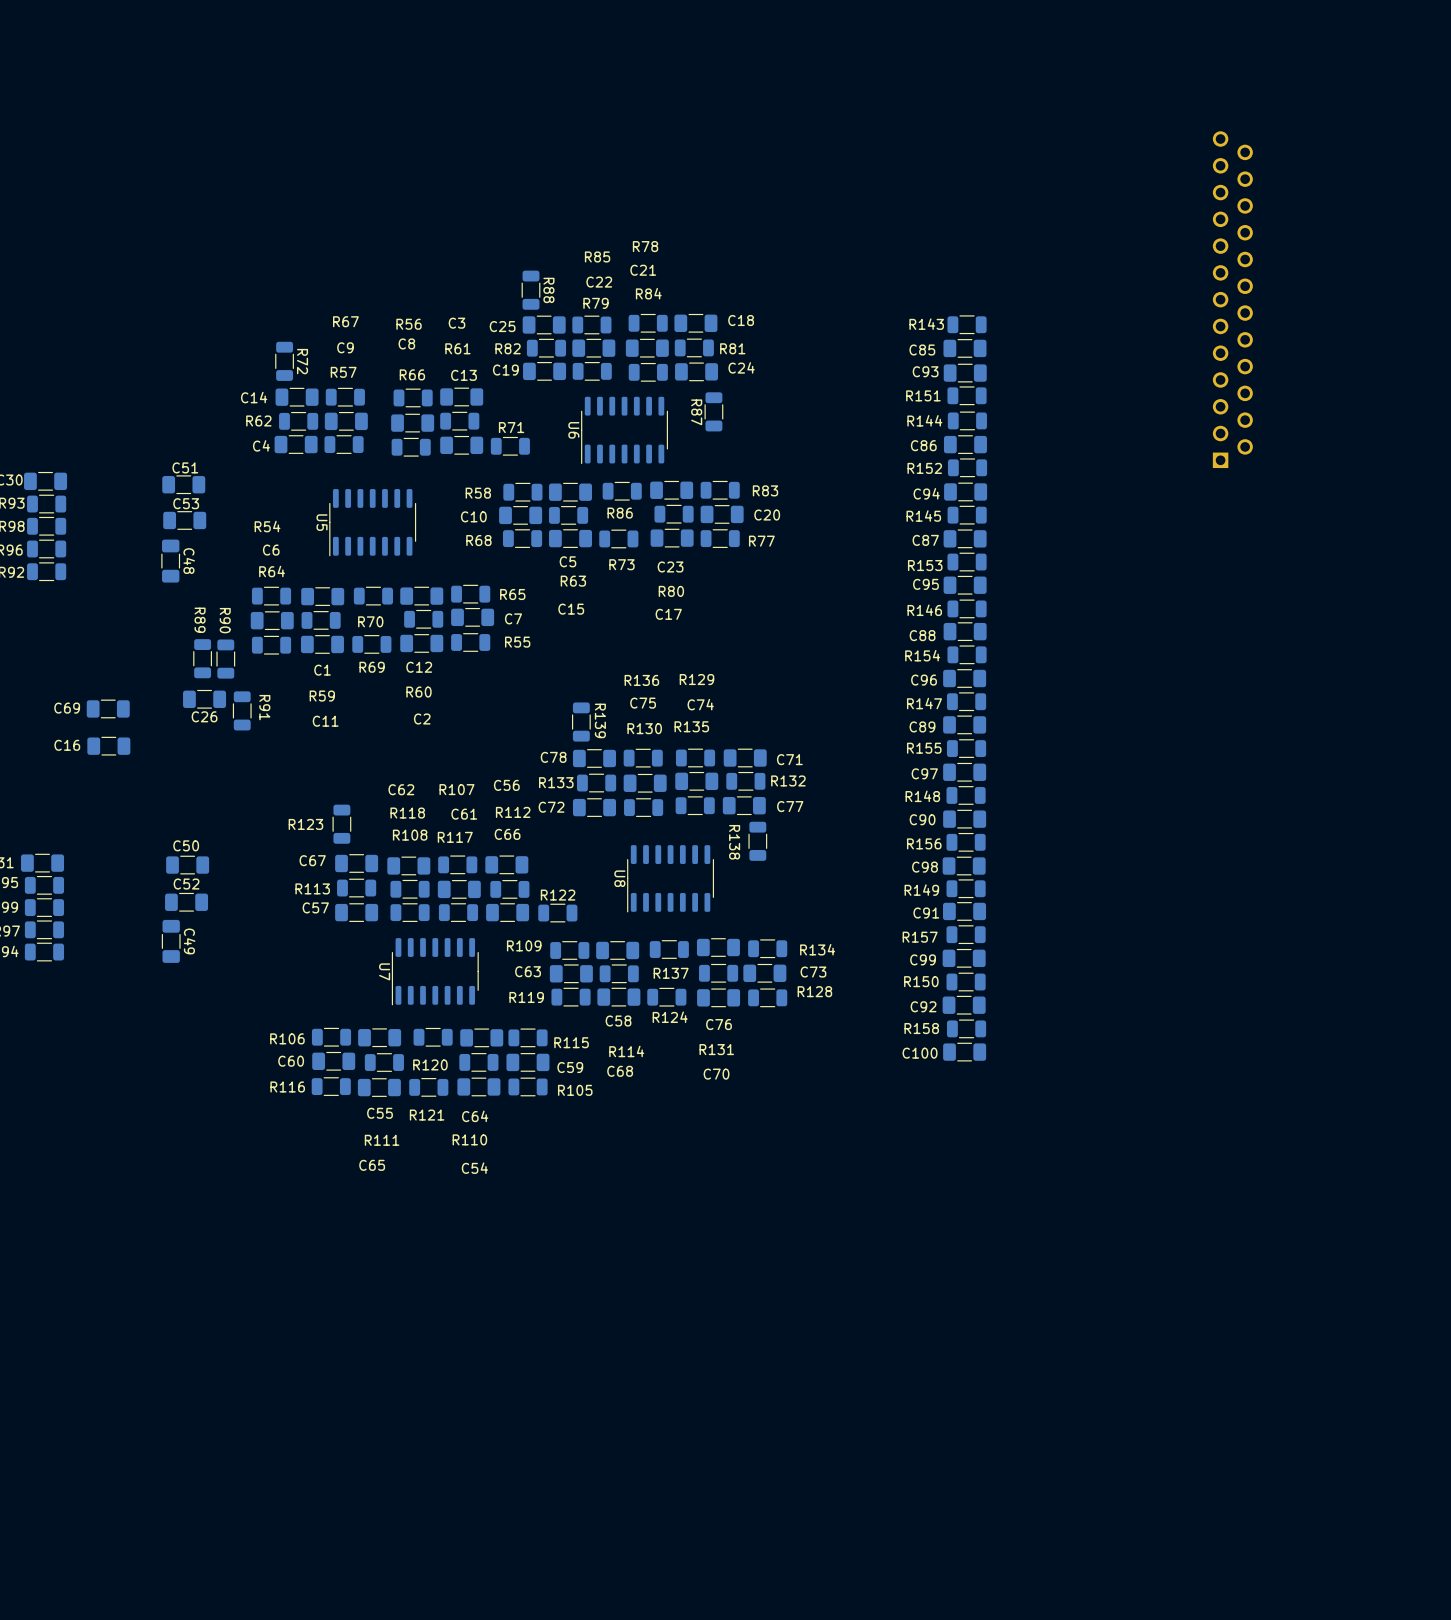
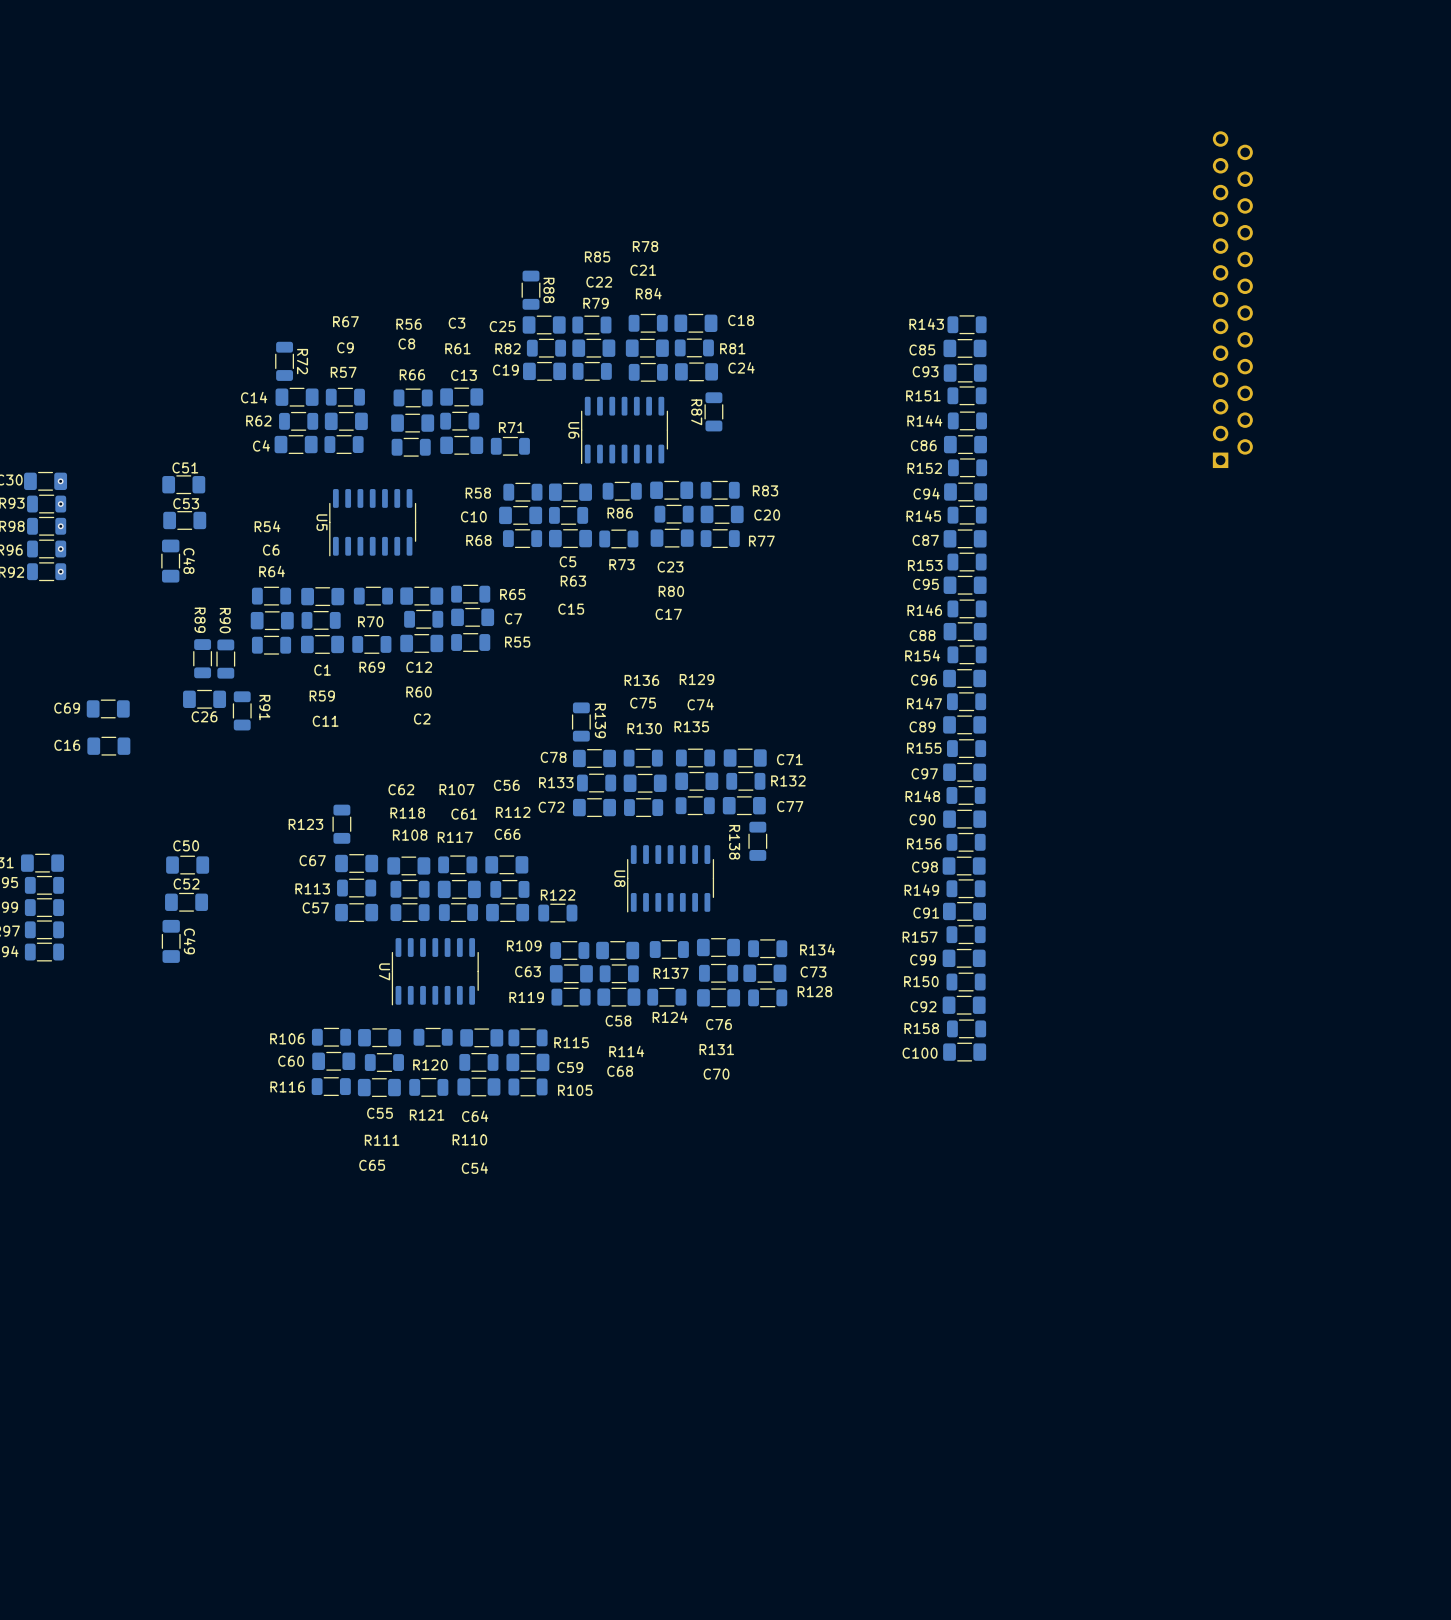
via: none -> (60, 481)
via: none -> (60, 504)
via: none -> (60, 526)
via: none -> (60, 548)
via: none -> (60, 571)

